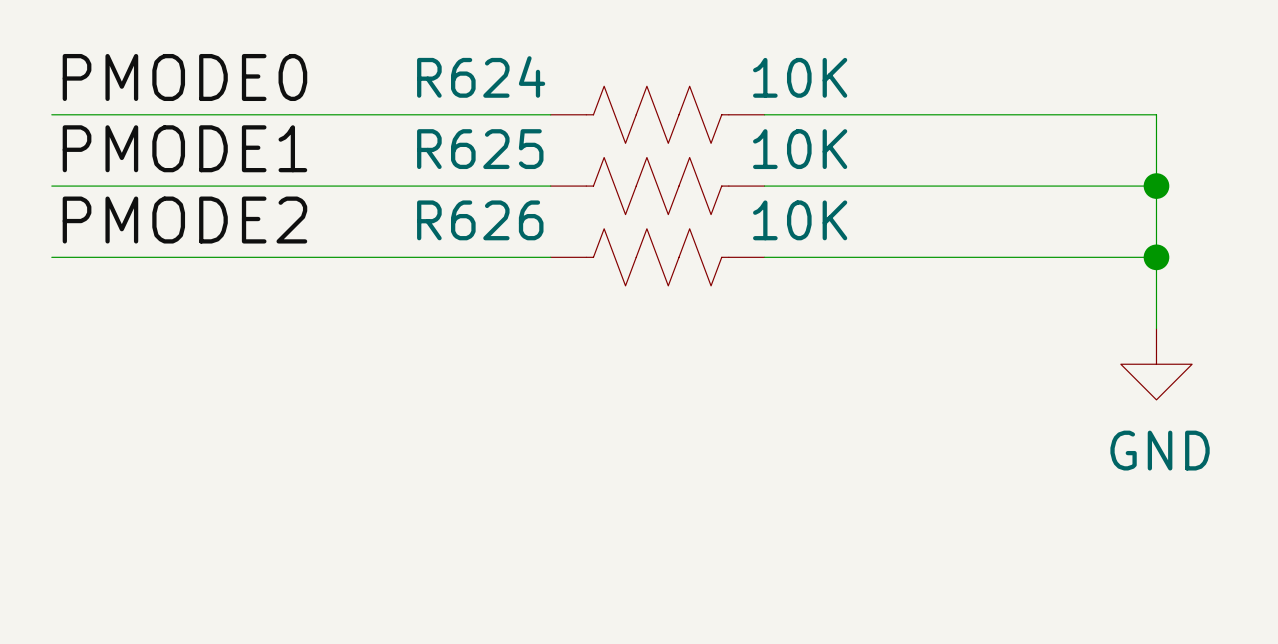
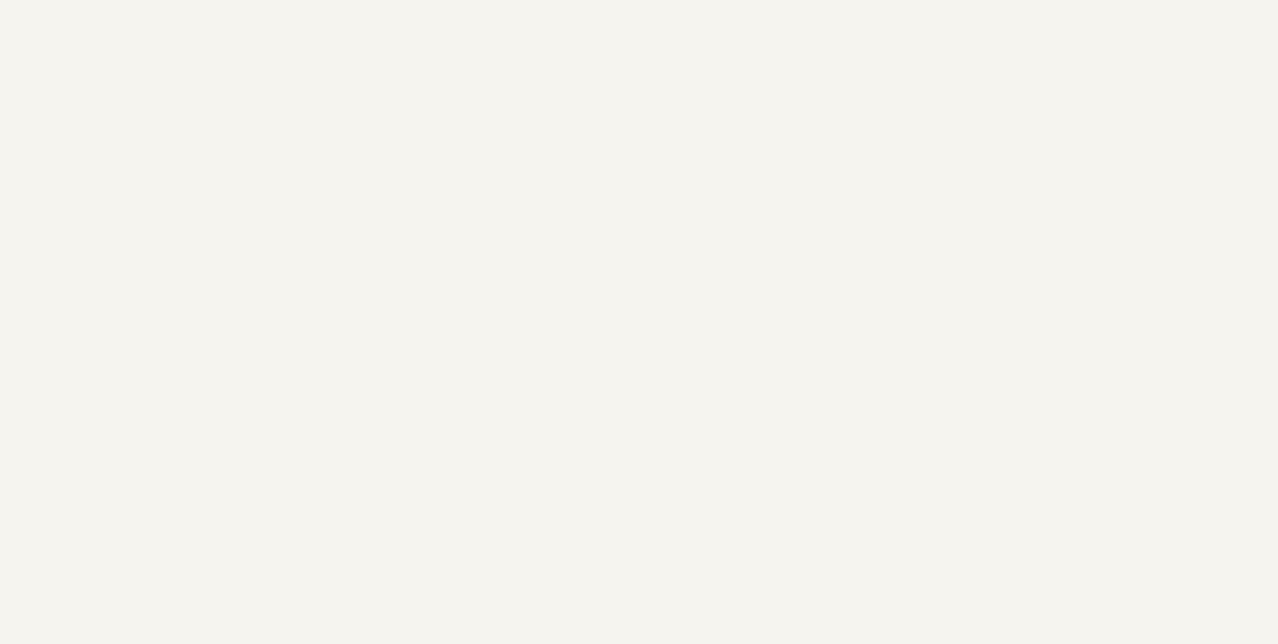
label: PMODE0 (184, 77) -> none
wire: (51, 114) (550, 114) -> none
R624: 10K (657, 114) -> none
wire: (764, 114) (1156, 114) (1156, 328) -> none
label: PMODE1 (184, 148) -> none
wire: (51, 186) (550, 186) -> none
R625: 10K (657, 186) -> none
wire: (764, 186) (1156, 186) -> none
junction: (1156, 186) -> none
label: PMODE2 (184, 220) -> none
wire: (51, 257) (550, 257) -> none
R626: 10K (657, 257) -> none
wire: (764, 257) (1156, 257) -> none
junction: (1156, 257) -> none
power symbol: GND (1156, 364) -> none

